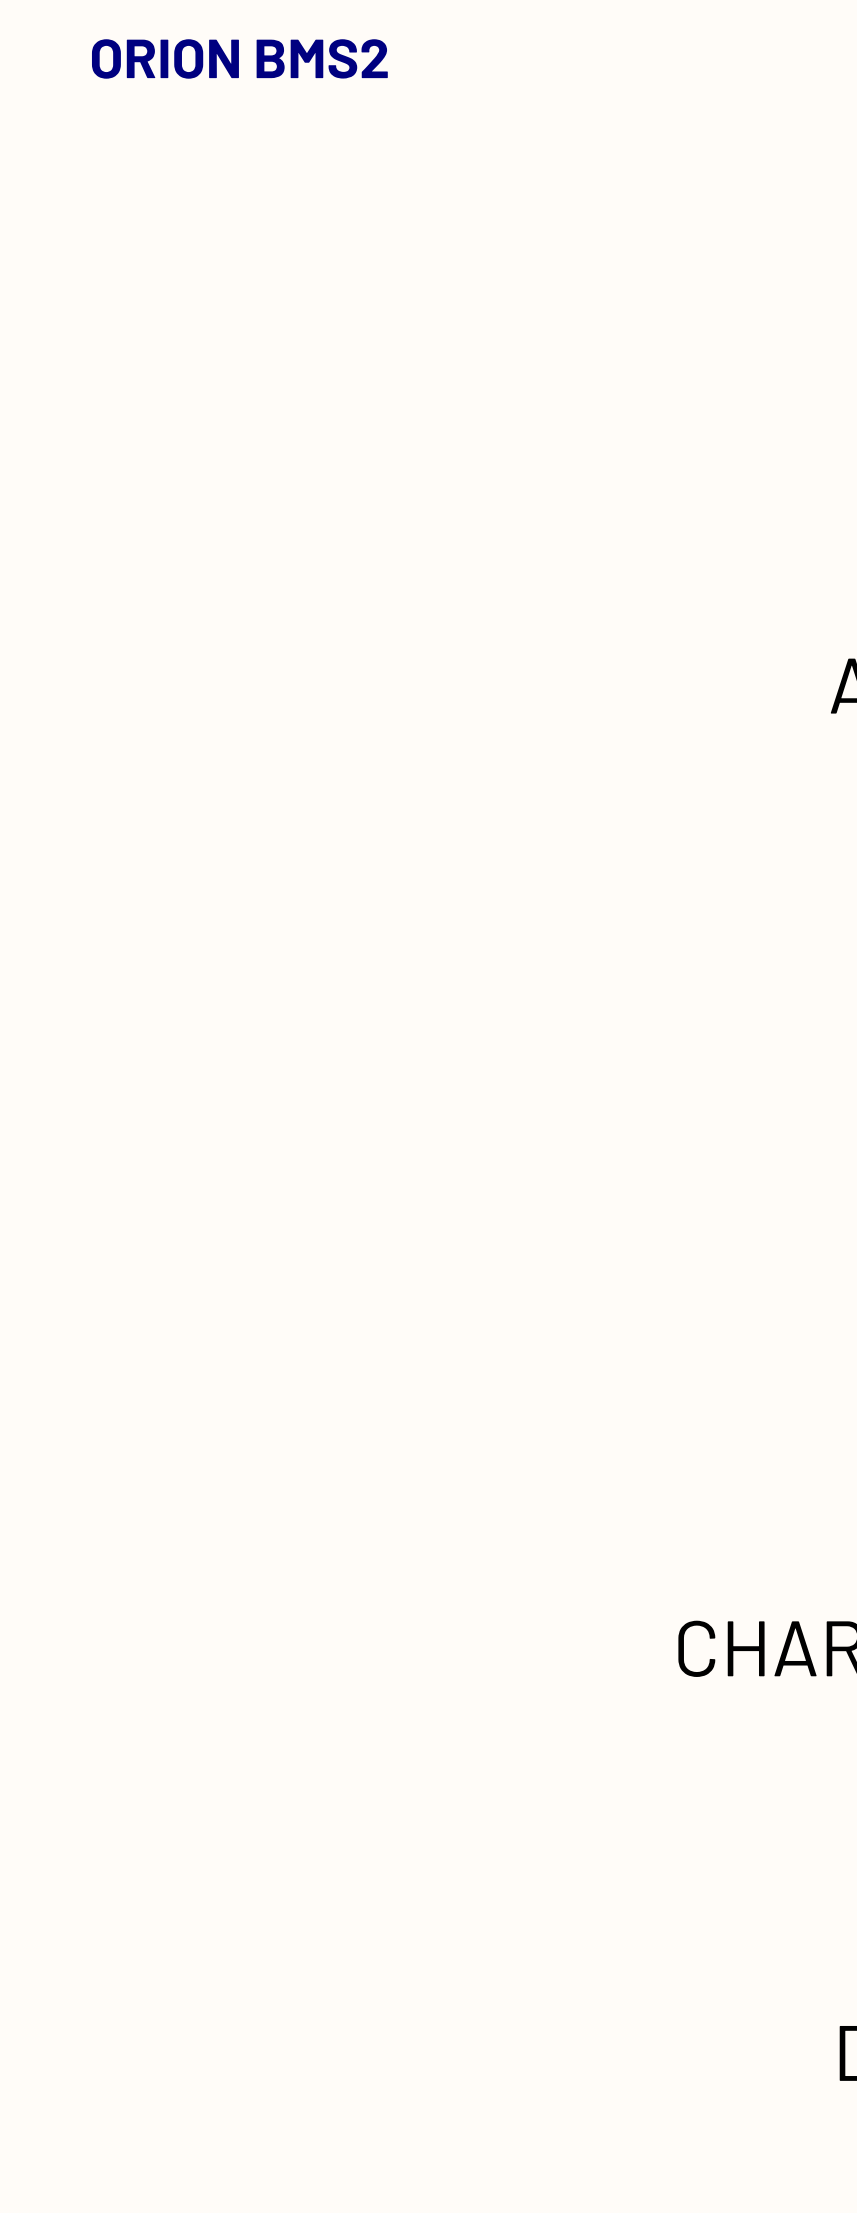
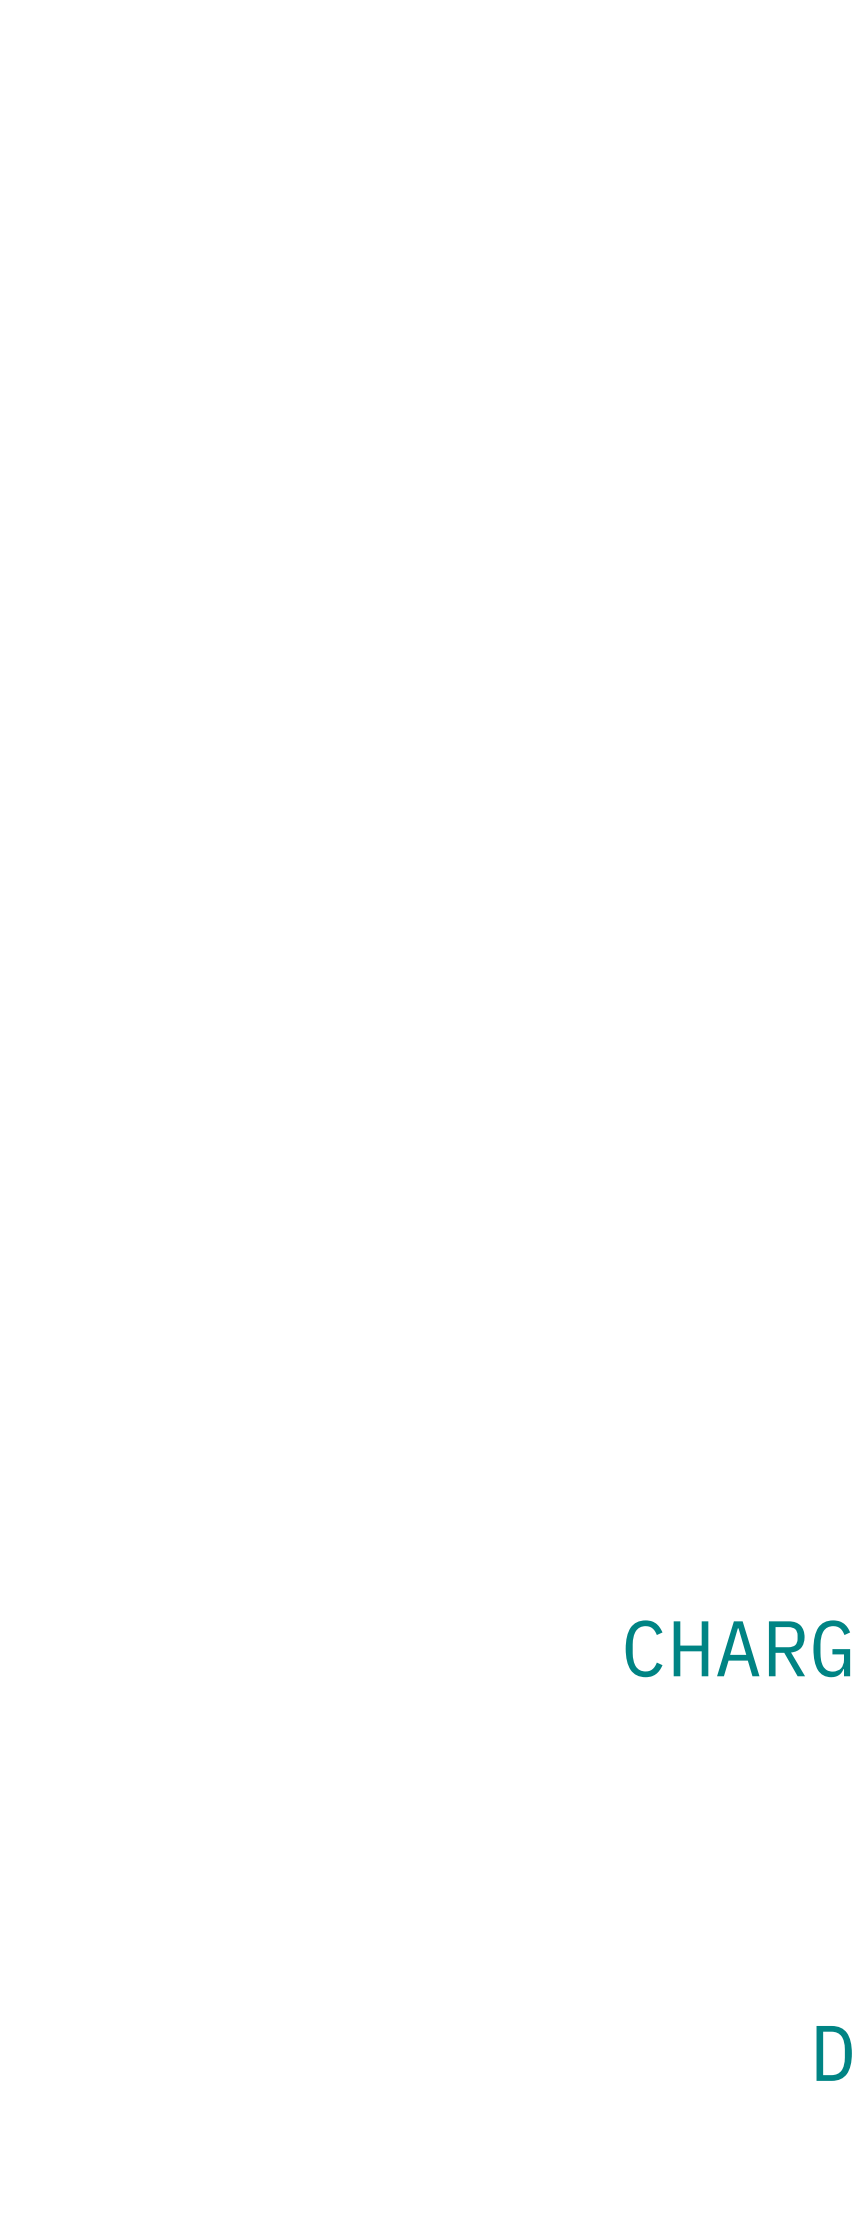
text: ORION BMS2 (239, 58) -> none

